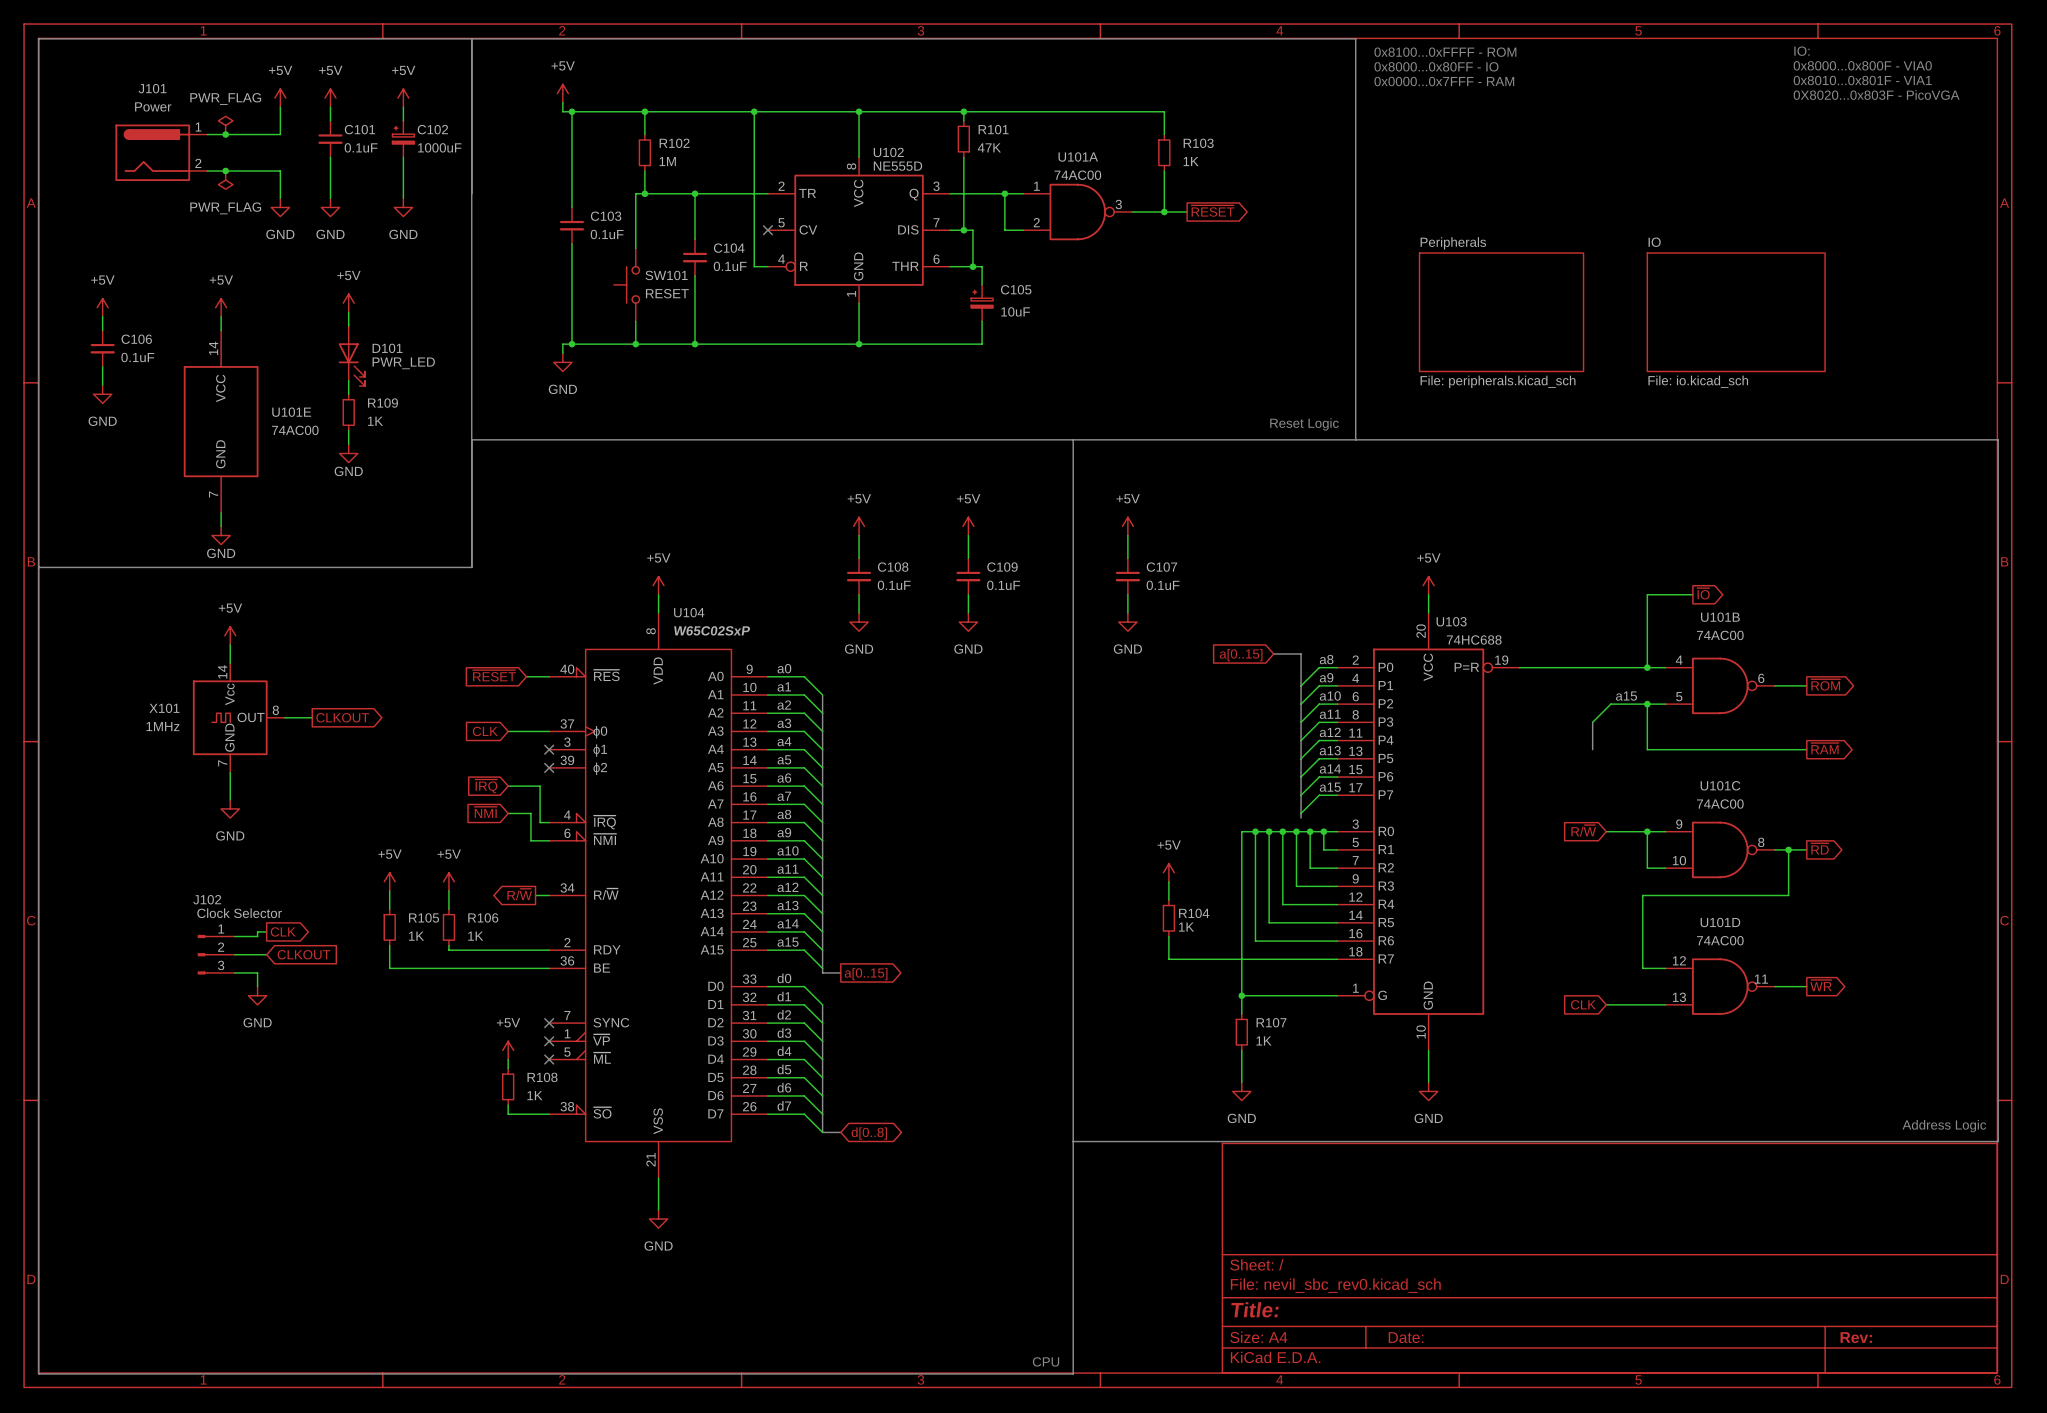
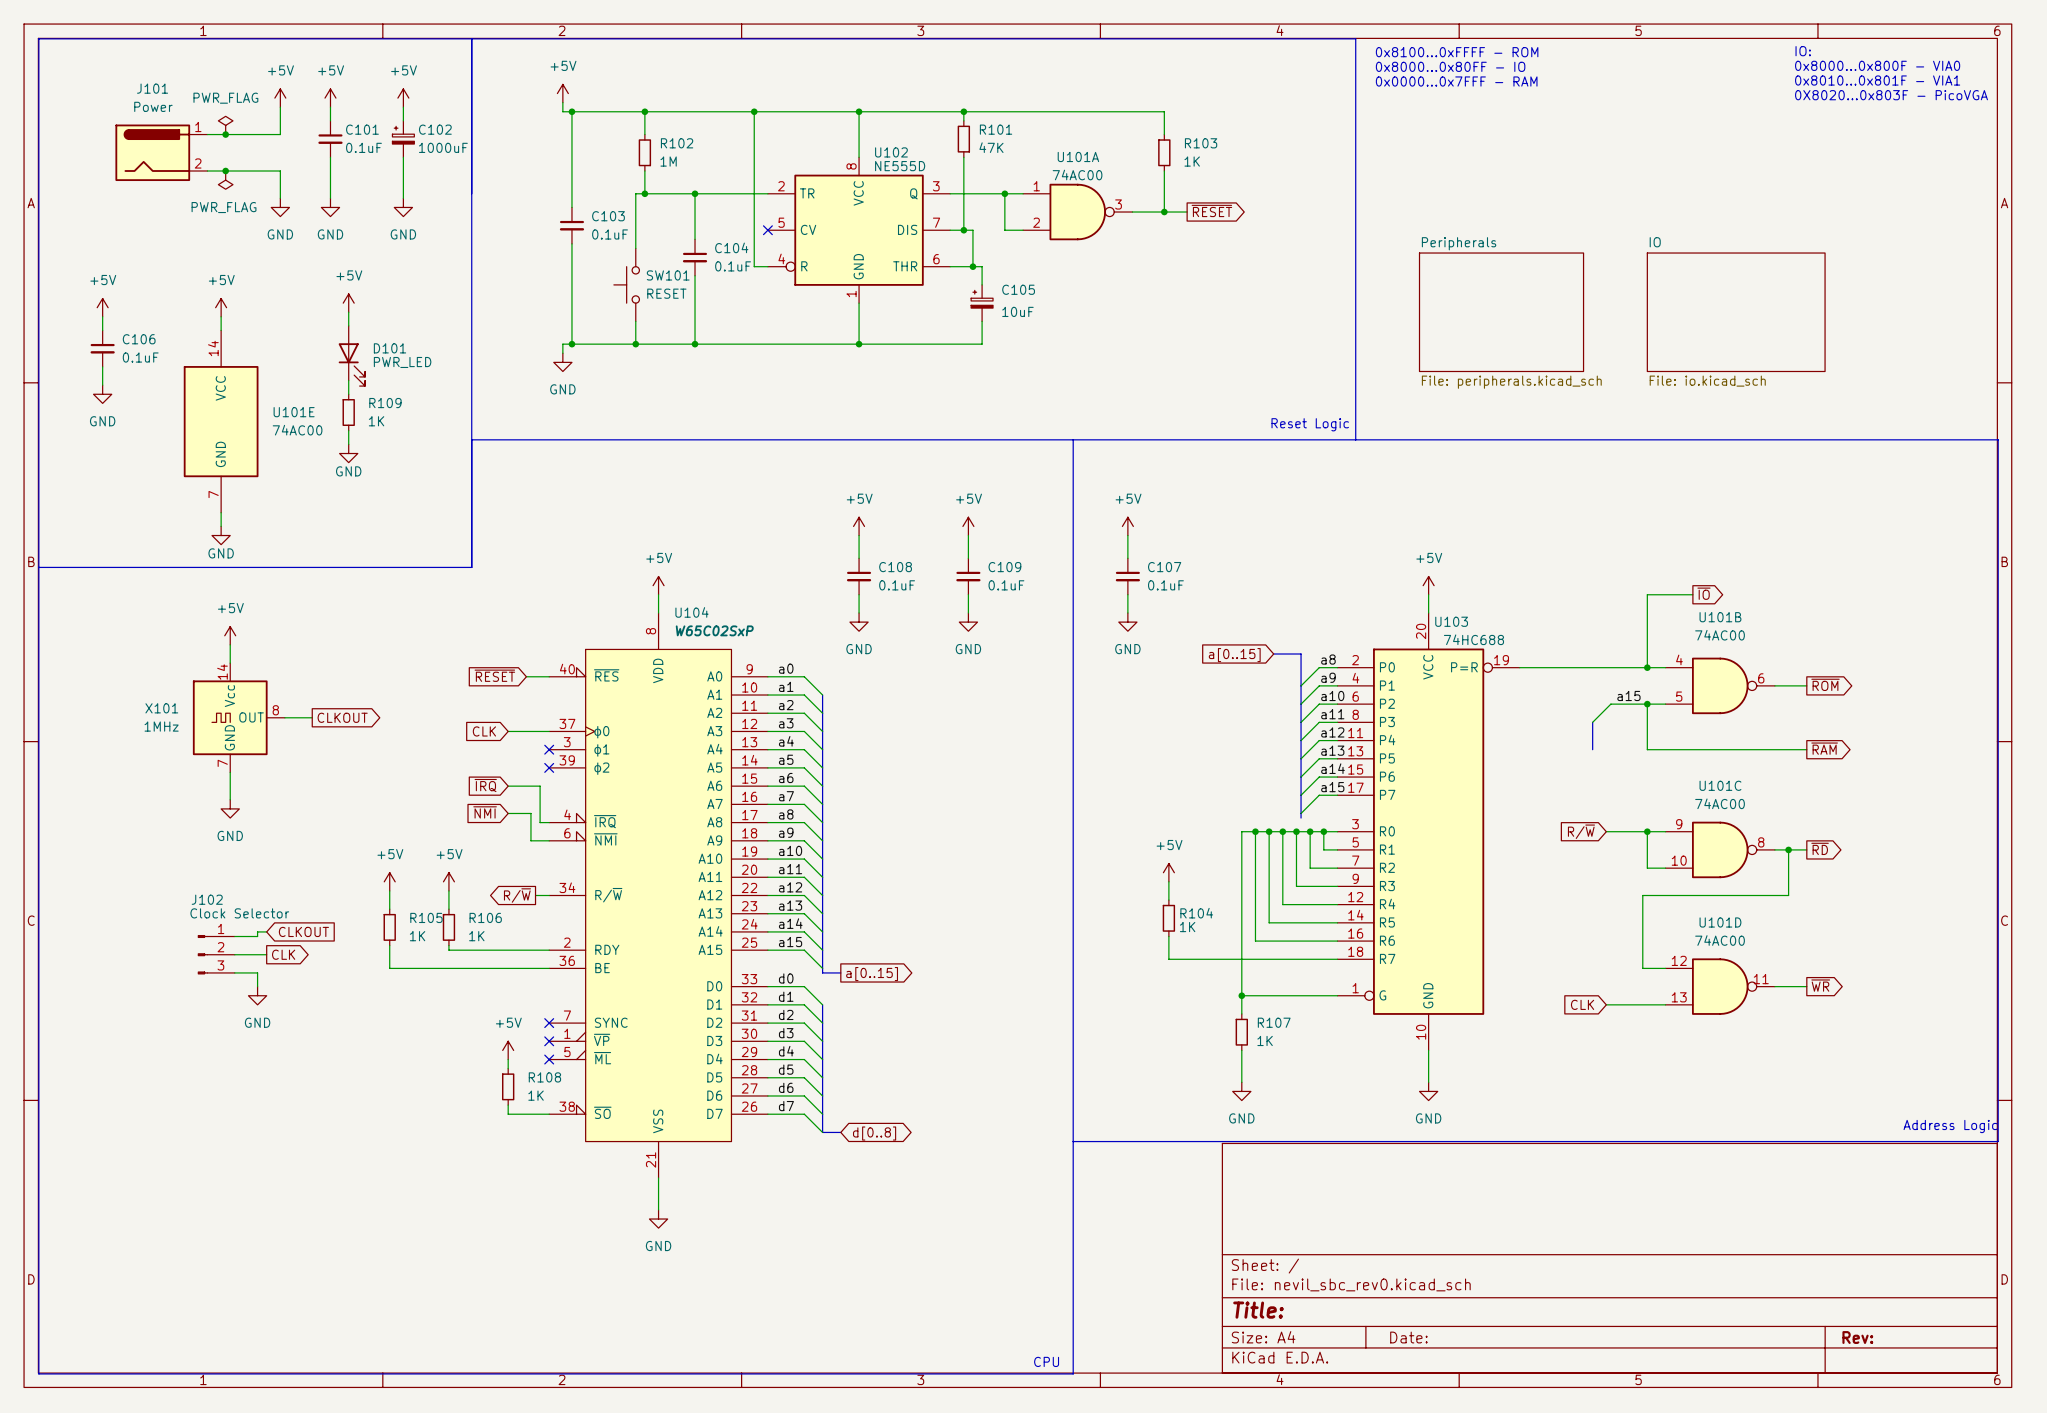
global label shape: output (283, 931) -> input (303, 931)
global label: CLK (283, 931) -> CLKOUT (303, 931)
global label shape: input (303, 954) -> output (283, 954)
global label: CLKOUT (303, 954) -> CLK (283, 954)

